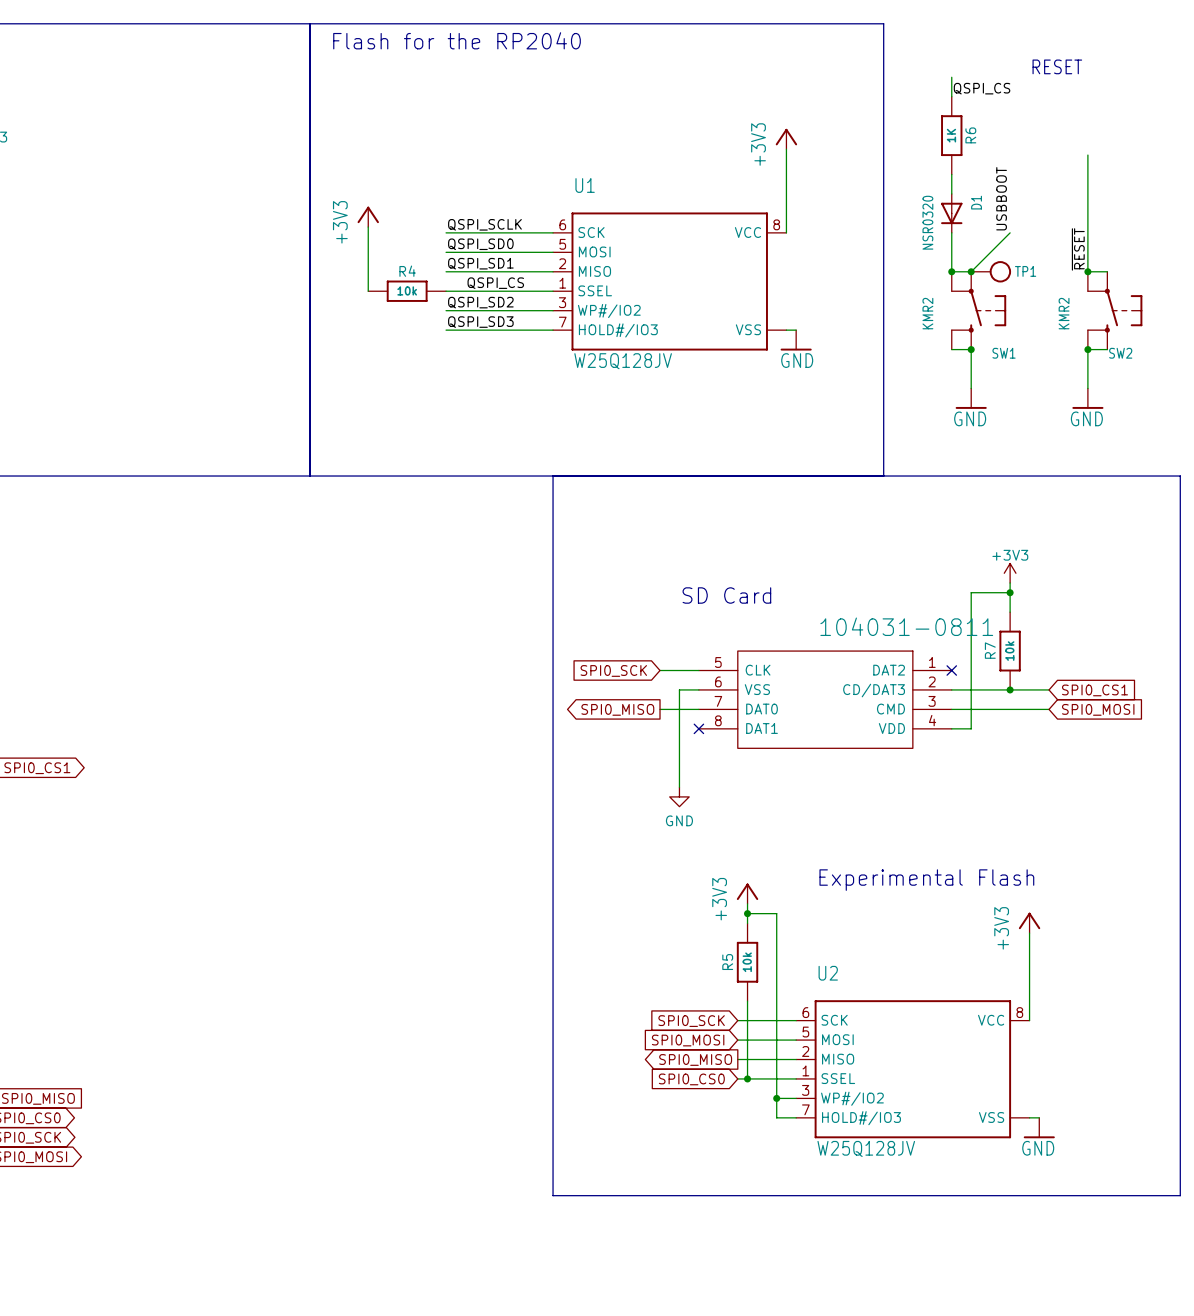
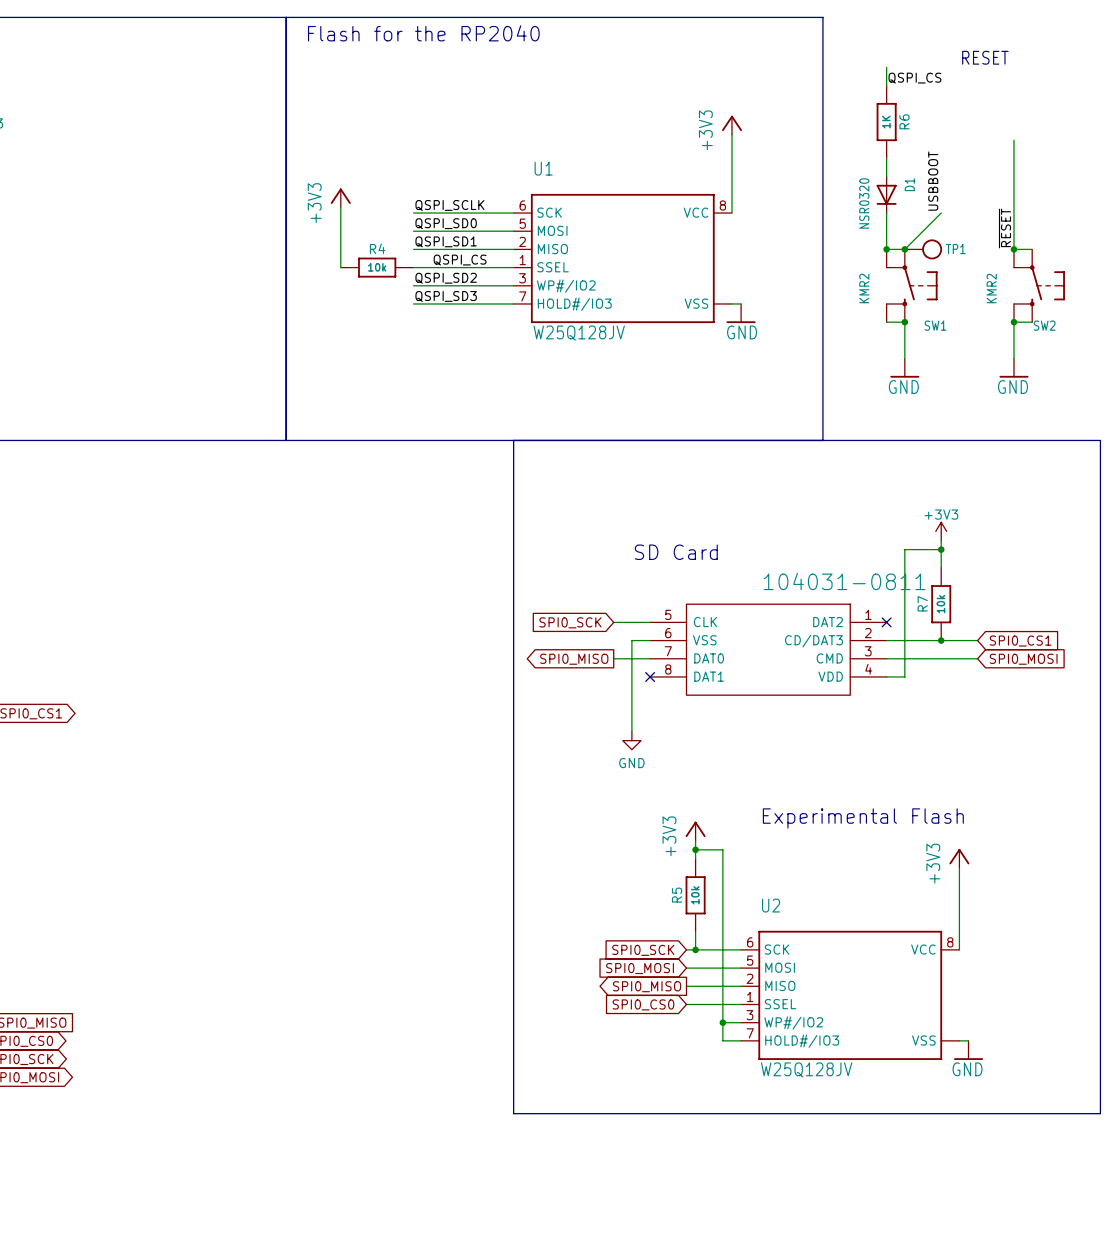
wire: (747, 1020) (747, 1078) -> none
junction: none -> (695, 949)
junction: (747, 1078) -> none

